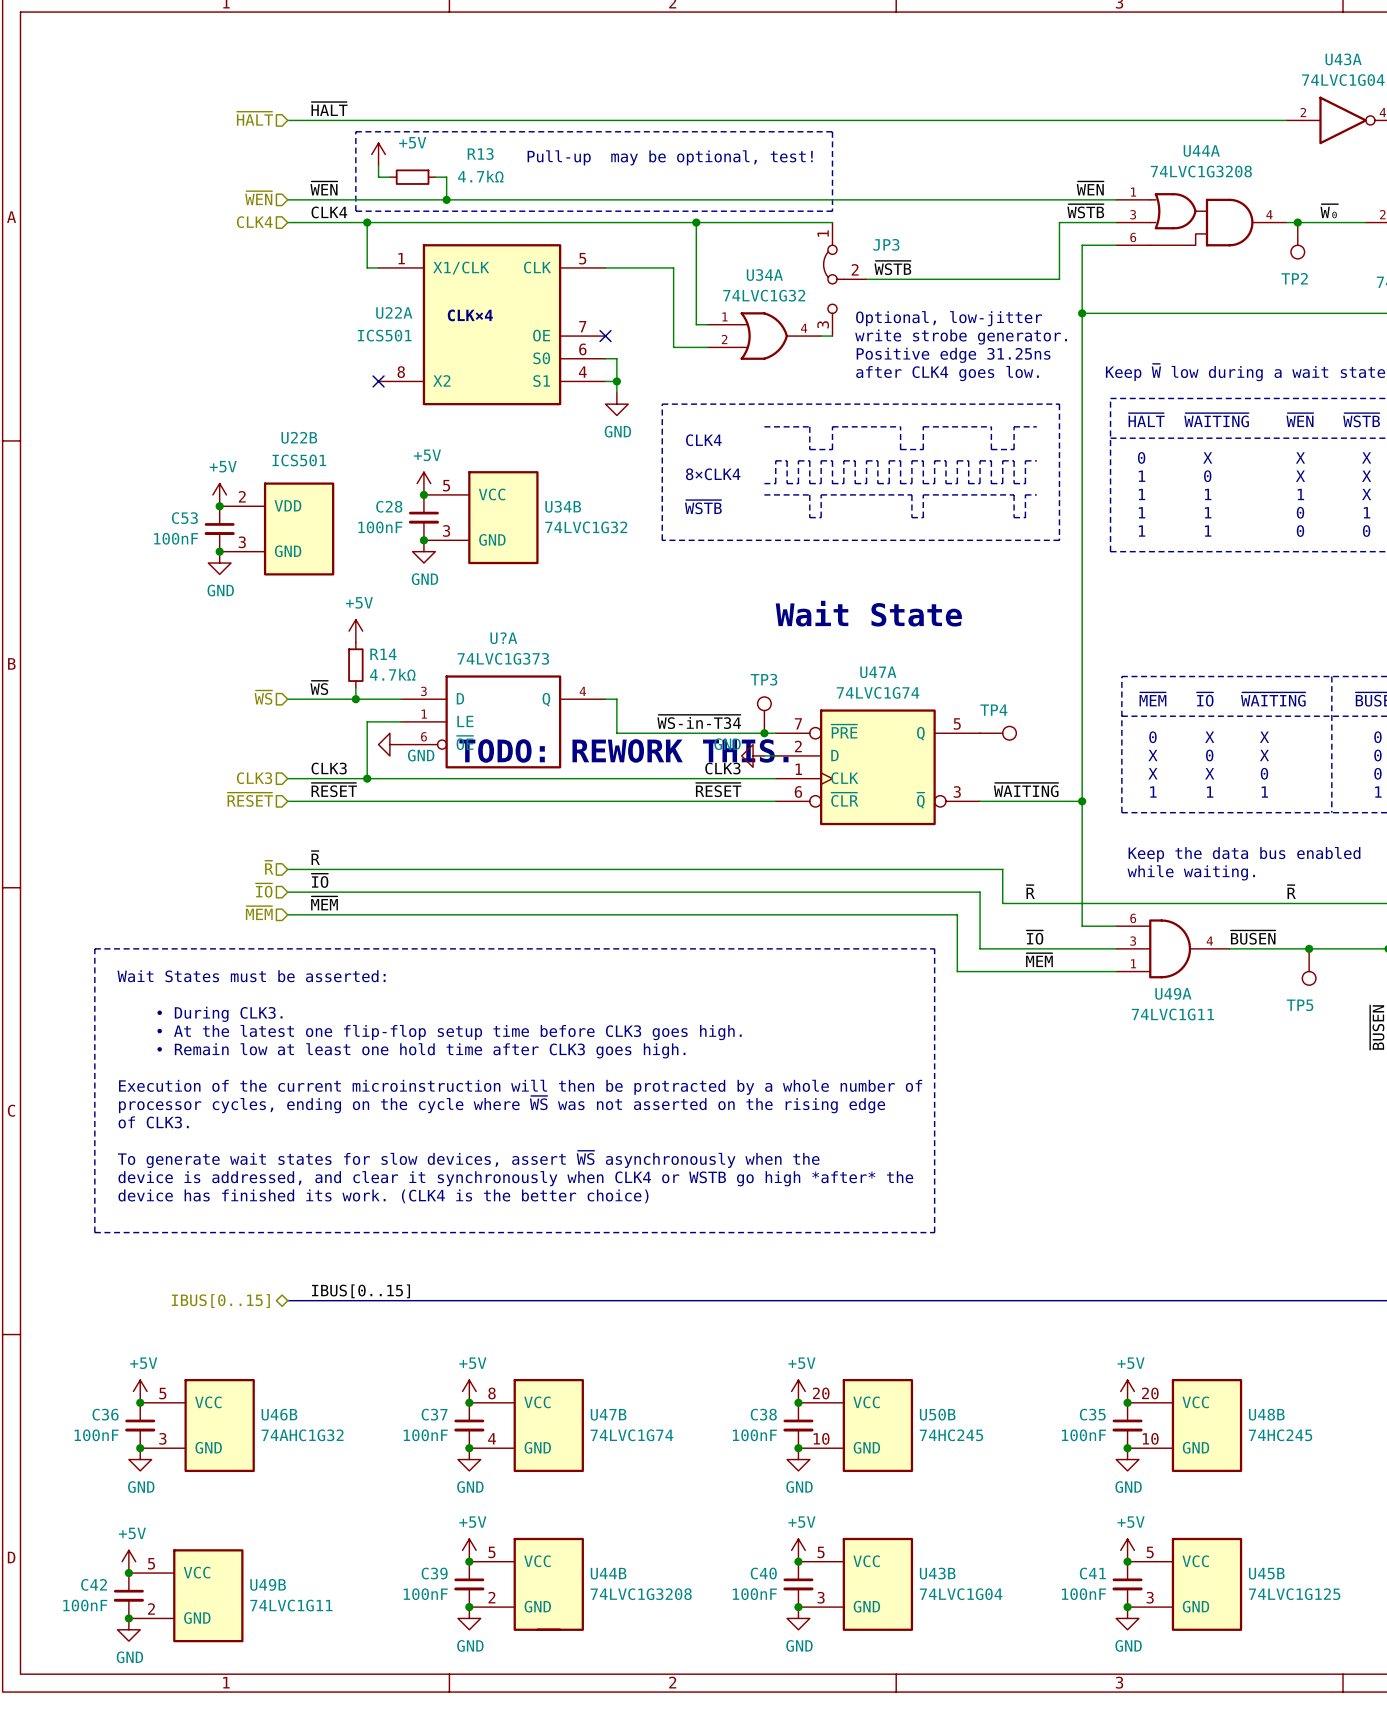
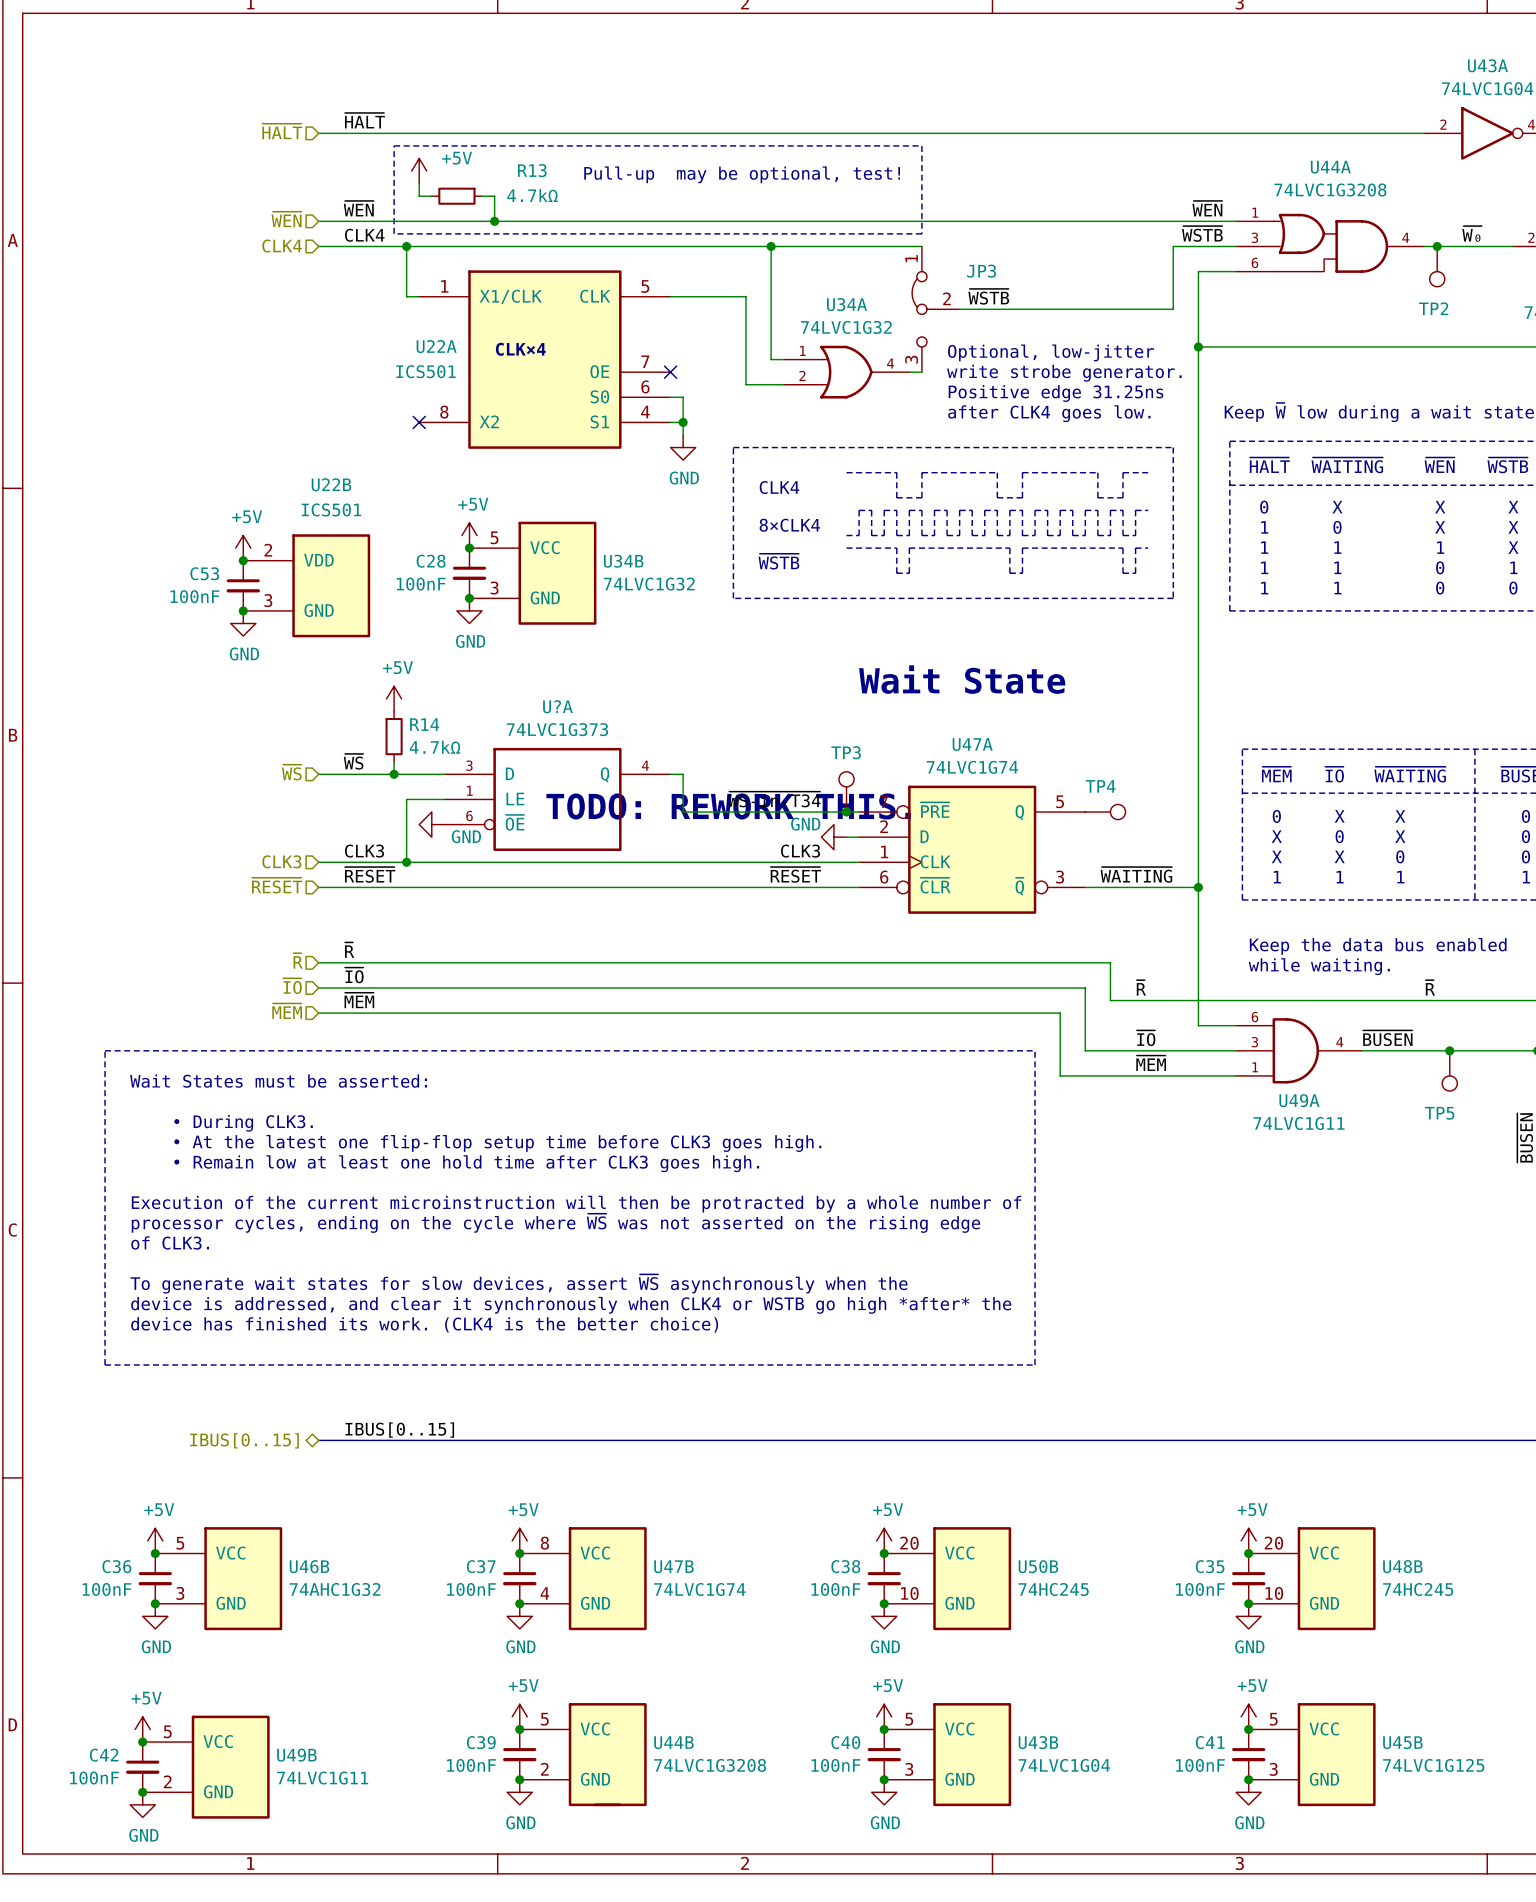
text position: TODO: REWORK THIS. (623, 750) -> TODO: REWORK THIS. (728, 806)

